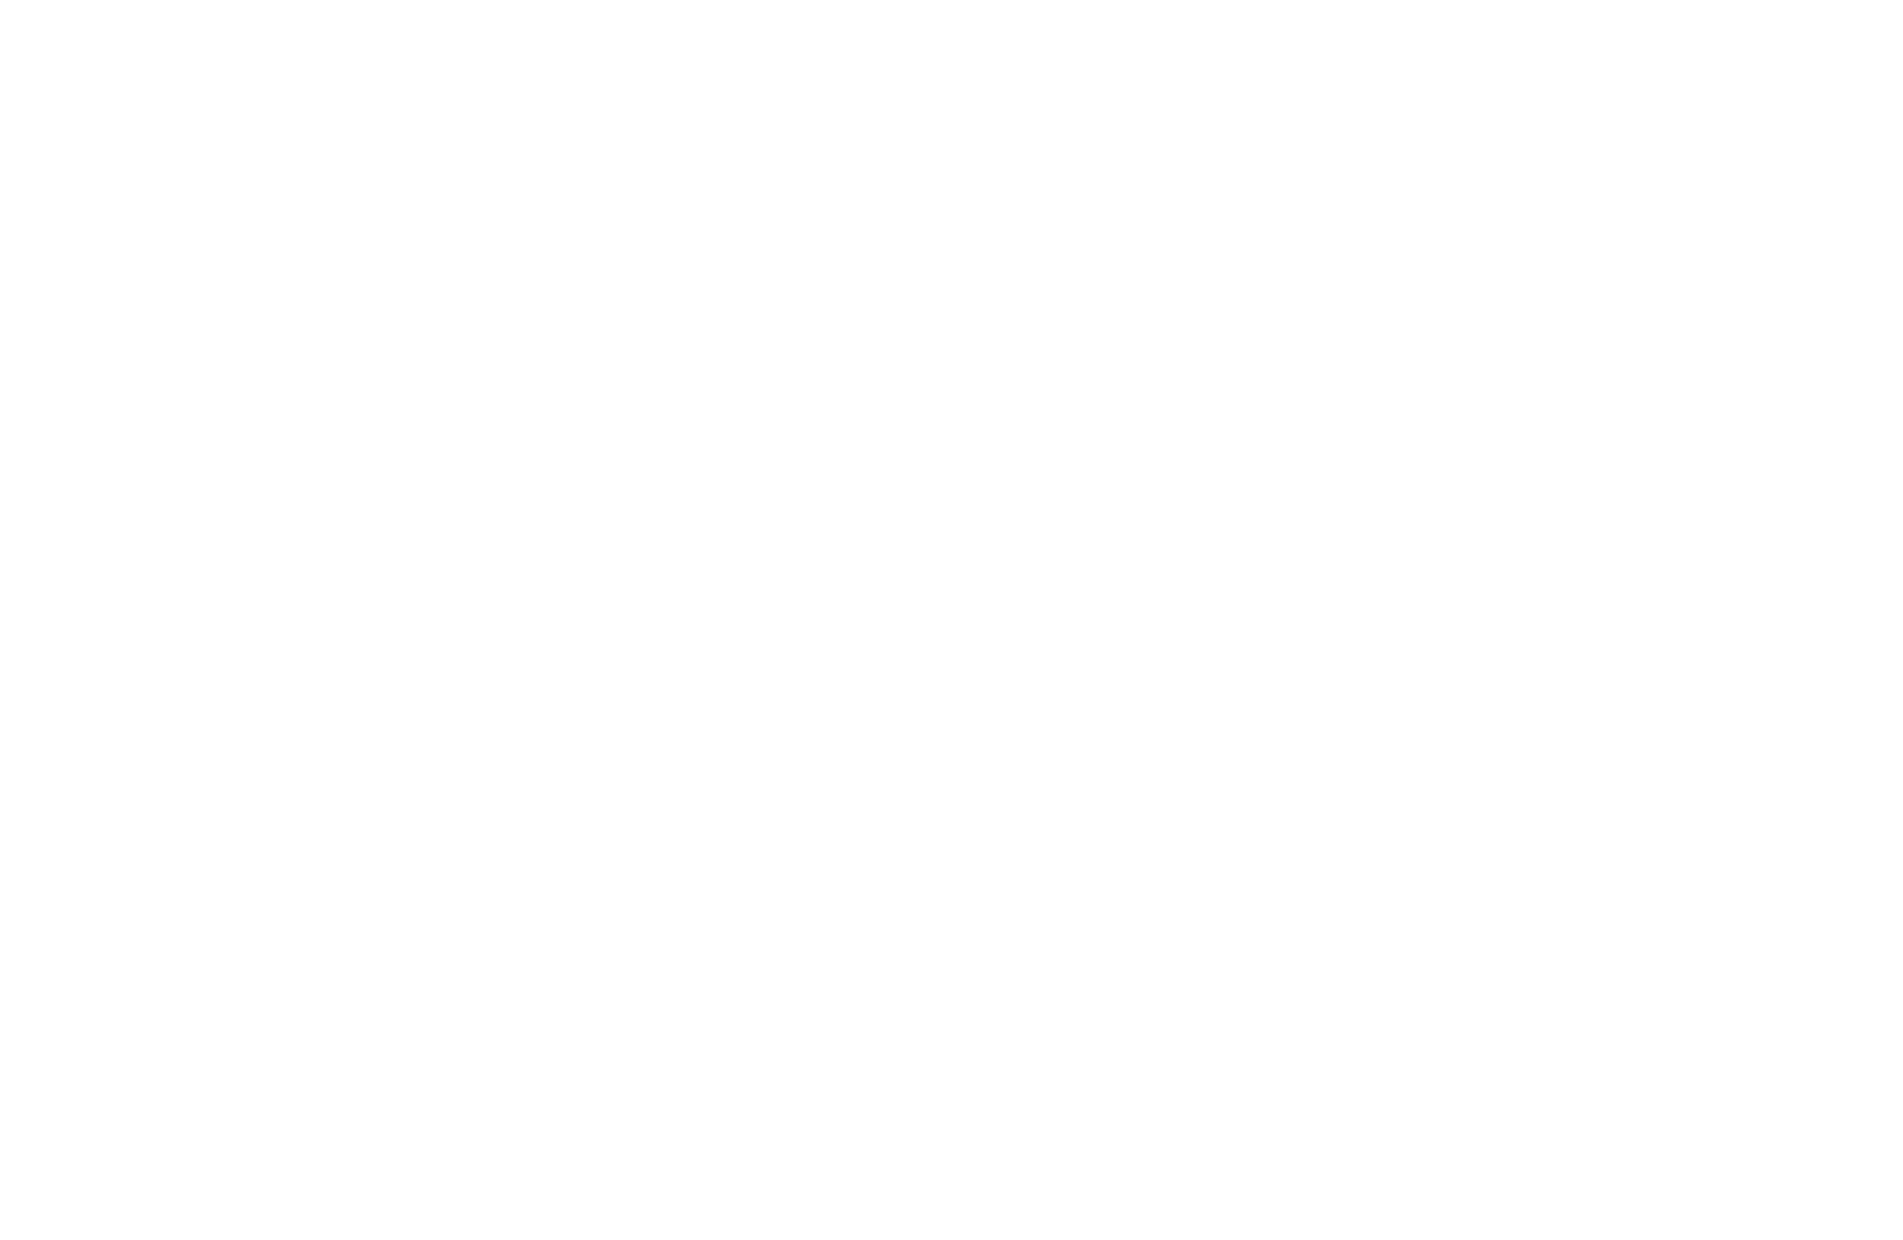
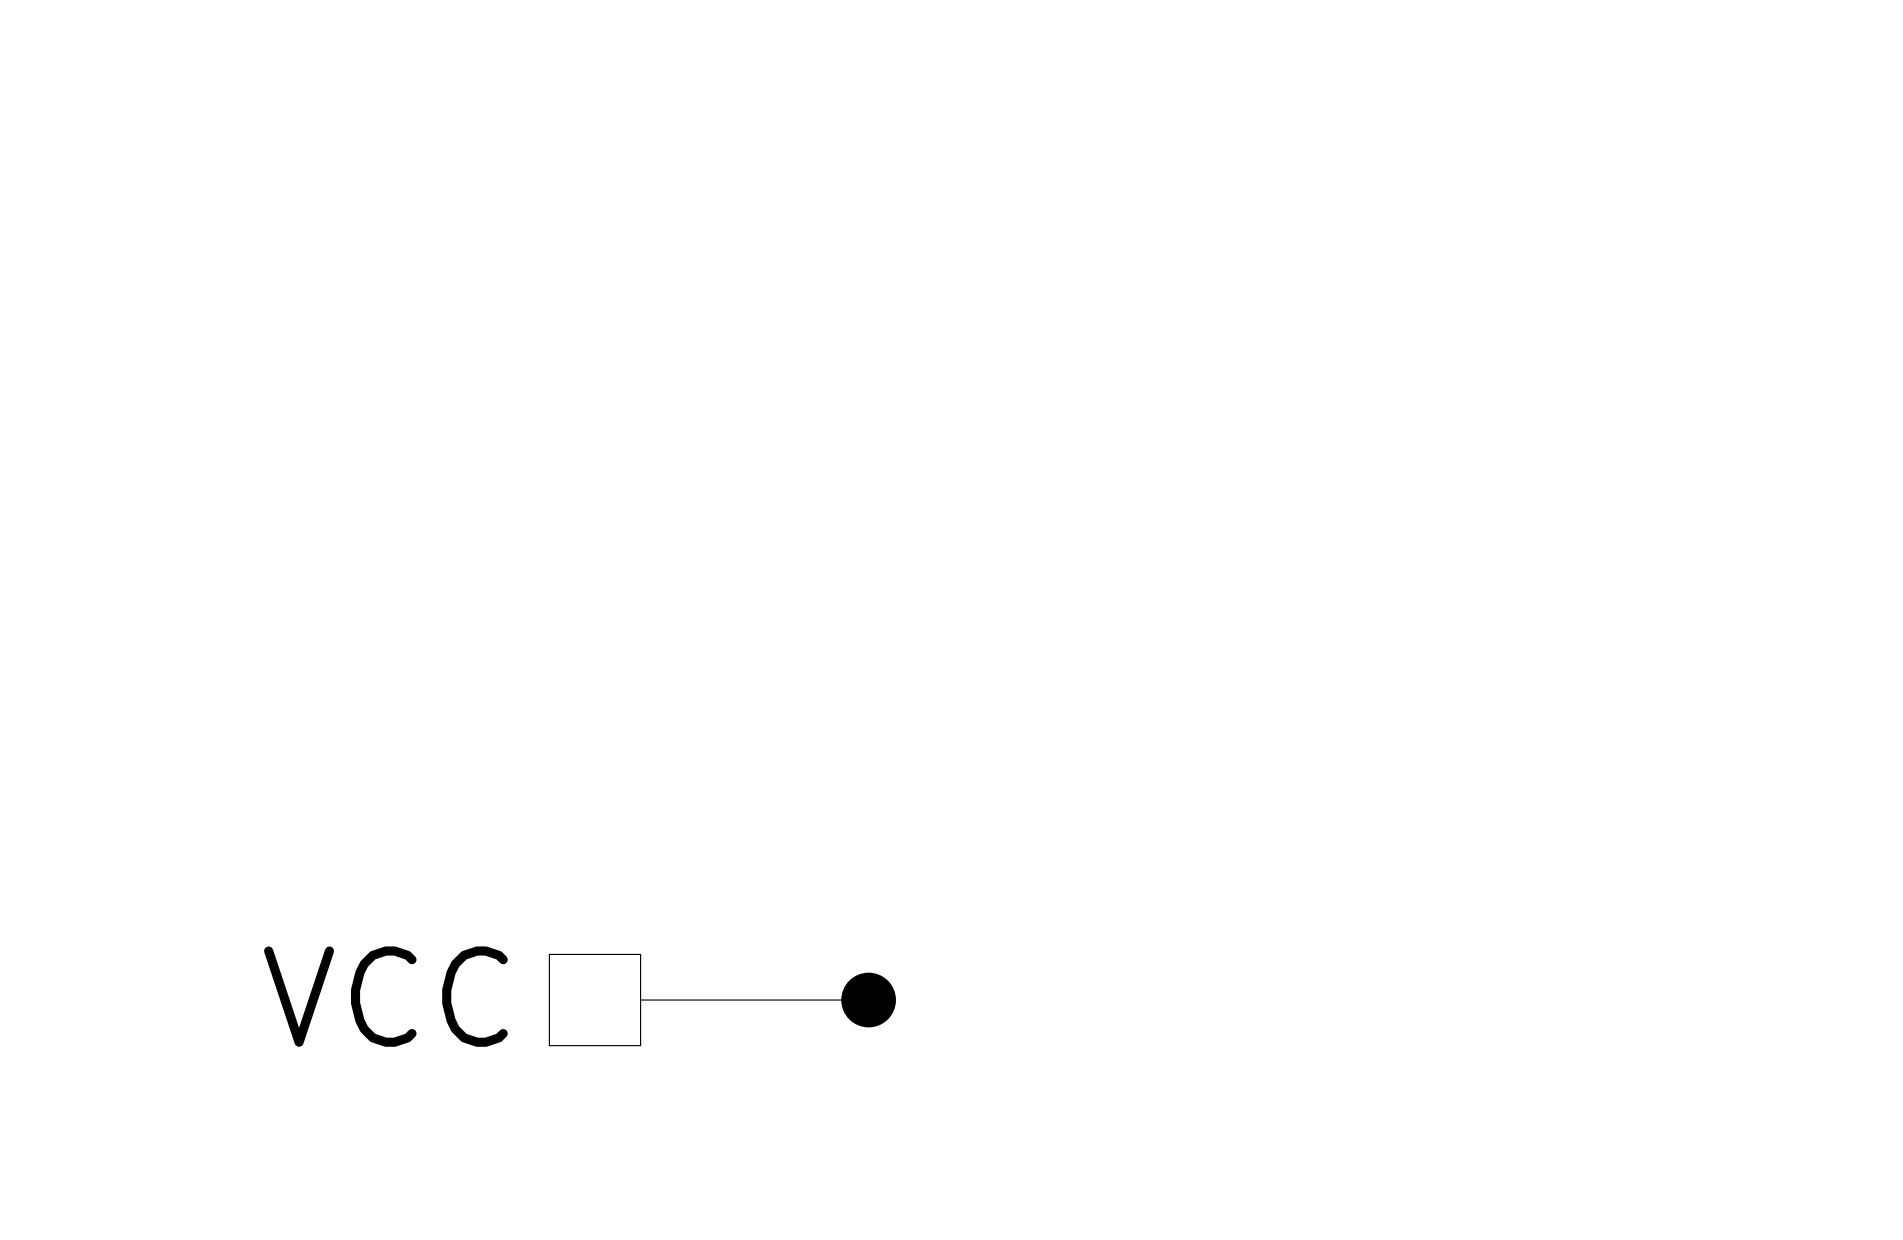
hierarchical label: none -> VCC (385, 996)
wire: none -> (640, 1000) (868, 1000)
junction: none -> (868, 1000)

